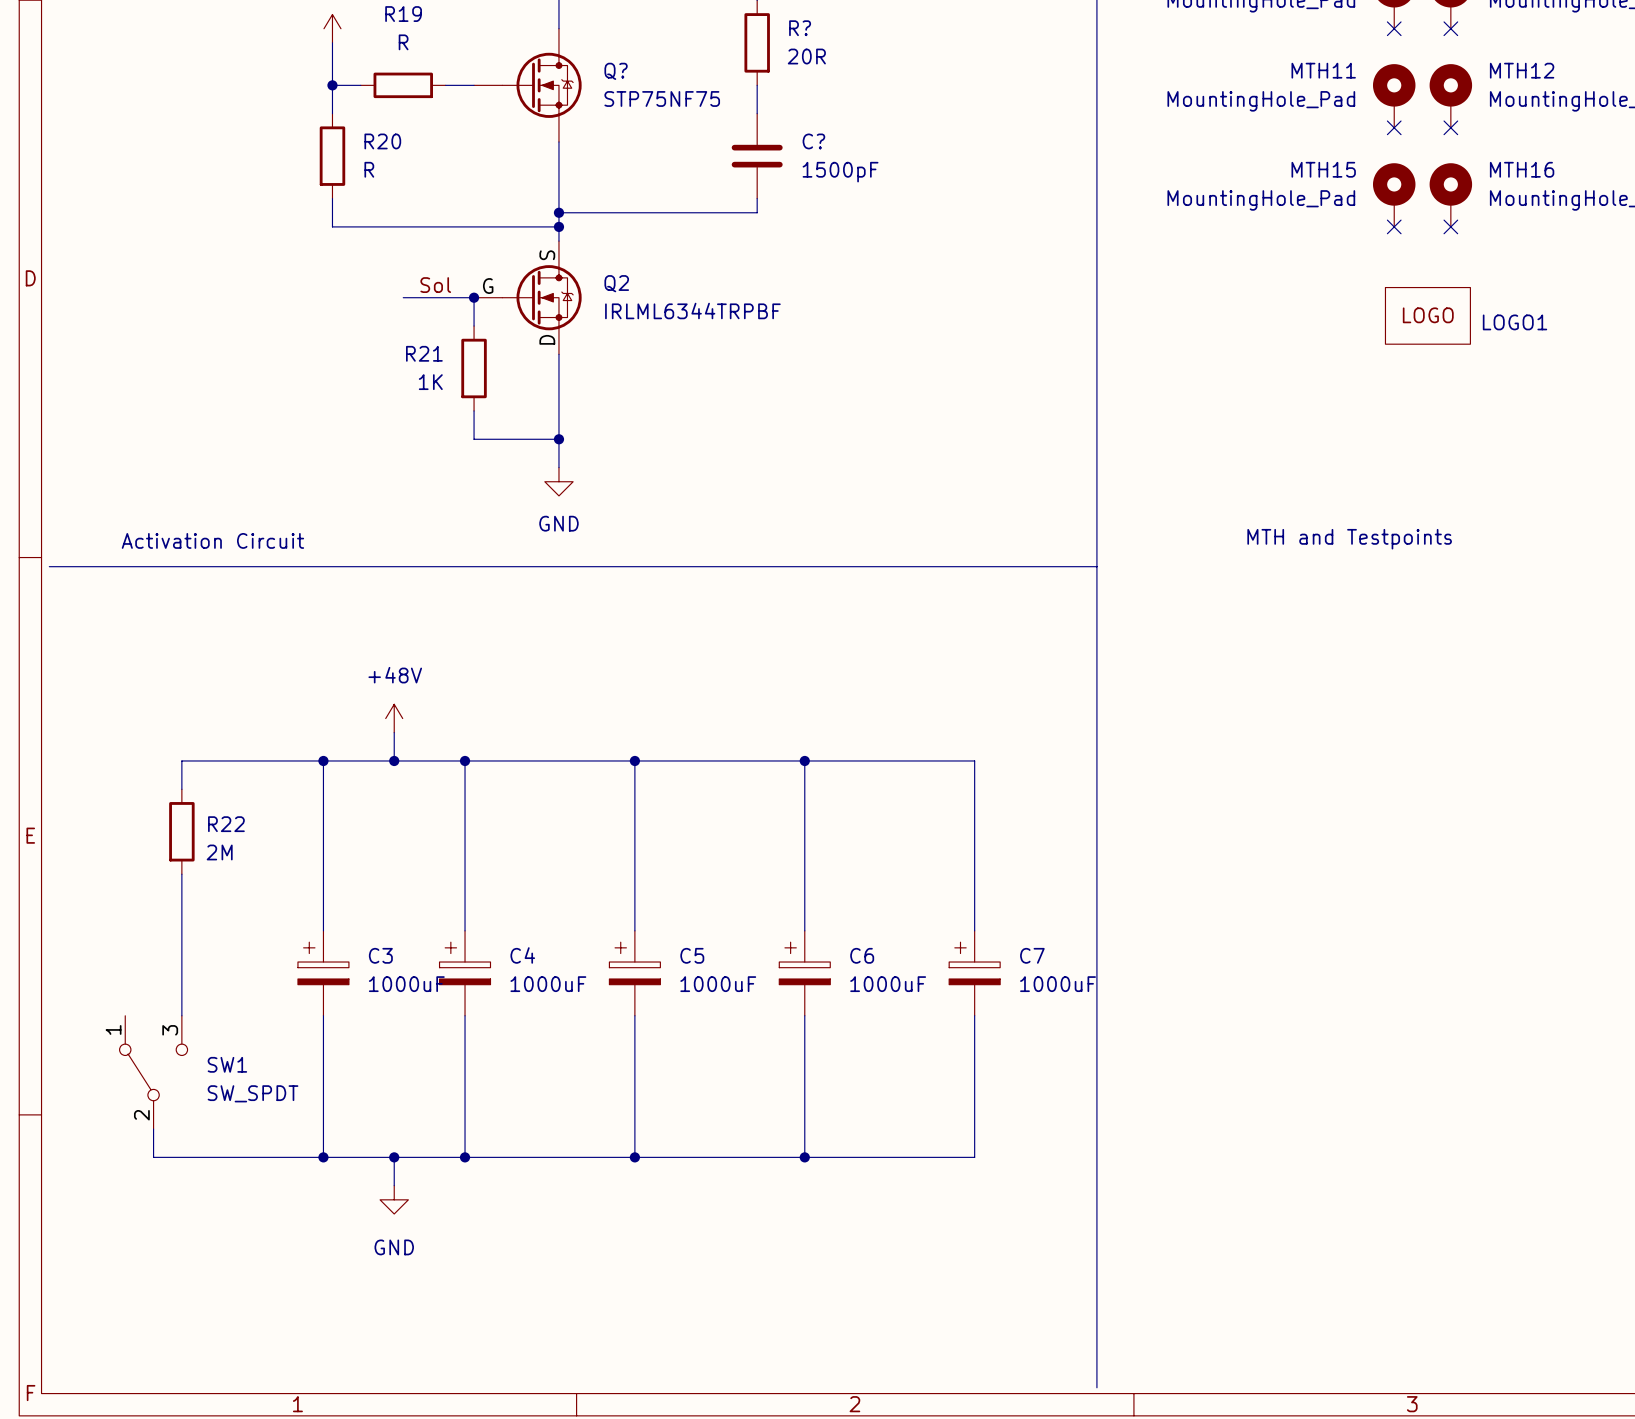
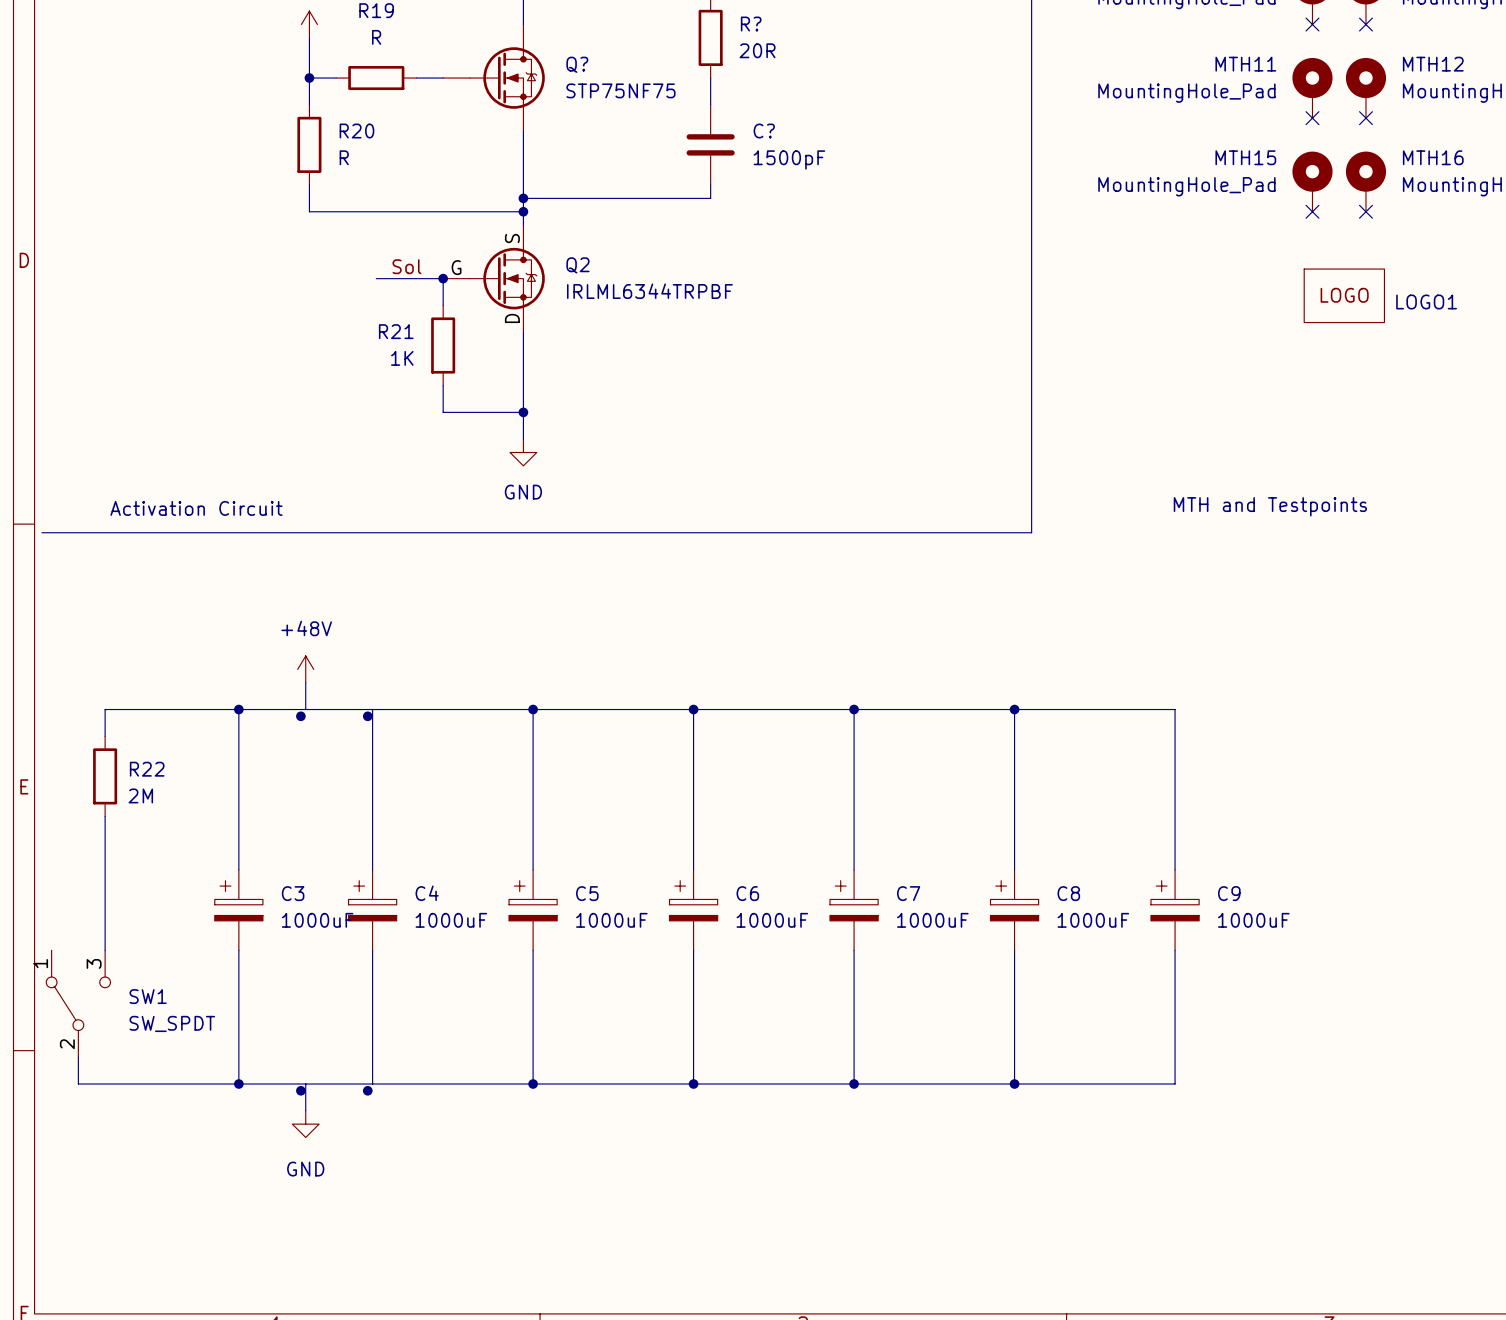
line: (1096, 566) (1096, 1387) -> none
power symbol position: +48V (394, 718) -> +48V (305, 669)
wire: (394, 732) (394, 760) -> (305, 682) (305, 709)
junction: none -> (238, 709)
junction: none -> (533, 709)
junction: none -> (693, 709)
wire: none -> (854, 709) (854, 870)
junction: none -> (854, 709)
wire: none -> (1014, 709) (1014, 870)
junction: none -> (1014, 709)
wire: (323, 760) (323, 930) -> (238, 709) (238, 870)
wire: (465, 760) (465, 930) -> (372, 709) (372, 870)
junction: (465, 760) -> none
wire: (634, 760) (634, 930) -> (533, 709) (533, 870)
junction: (634, 760) -> none
wire: (804, 760) (804, 930) -> (693, 709) (693, 870)
junction: (804, 760) -> none
wire: none -> (105, 736) (105, 709) (1175, 709) (1175, 870)
wire: (181, 789) (181, 760) (974, 760) (974, 930) -> none
R22 position: (181, 831) -> (105, 776)
wire: (181, 874) (181, 1015) -> (105, 816) (105, 950)
C8: none -> 1000uF (1014, 910)
C9: none -> 1000uF (1175, 910)
C3 position: (323, 973) -> (238, 910)
C4 position: (465, 973) -> (372, 910)
C5 position: (634, 973) -> (533, 910)
C6 position: (804, 973) -> (693, 910)
C7 position: (974, 973) -> (854, 910)
wire: none -> (854, 950) (854, 1084)
wire: none -> (1014, 950) (1014, 1084)
wire: none -> (1175, 950) (1175, 1084) (78, 1084) (78, 1057)
wire: (323, 1015) (323, 1157) -> (238, 950) (238, 1084)
wire: (465, 1015) (465, 1157) -> (372, 950) (372, 1084)
wire: (634, 1015) (634, 1157) -> (533, 950) (533, 1084)
wire: (804, 1015) (804, 1157) -> (693, 950) (693, 1084)
wire: (974, 1015) (974, 1157) (153, 1157) (153, 1129) -> none
SW1 position: (153, 1072) -> (78, 1003)
junction: none -> (238, 1084)
junction: none -> (533, 1084)
junction: none -> (693, 1084)
junction: none -> (854, 1084)
junction: none -> (1014, 1084)
wire: (394, 1157) (394, 1185) -> (305, 1084) (305, 1110)
junction: (465, 1157) -> none
junction: (634, 1157) -> none
junction: (804, 1157) -> none
power symbol position: GND (394, 1199) -> GND (305, 1124)

